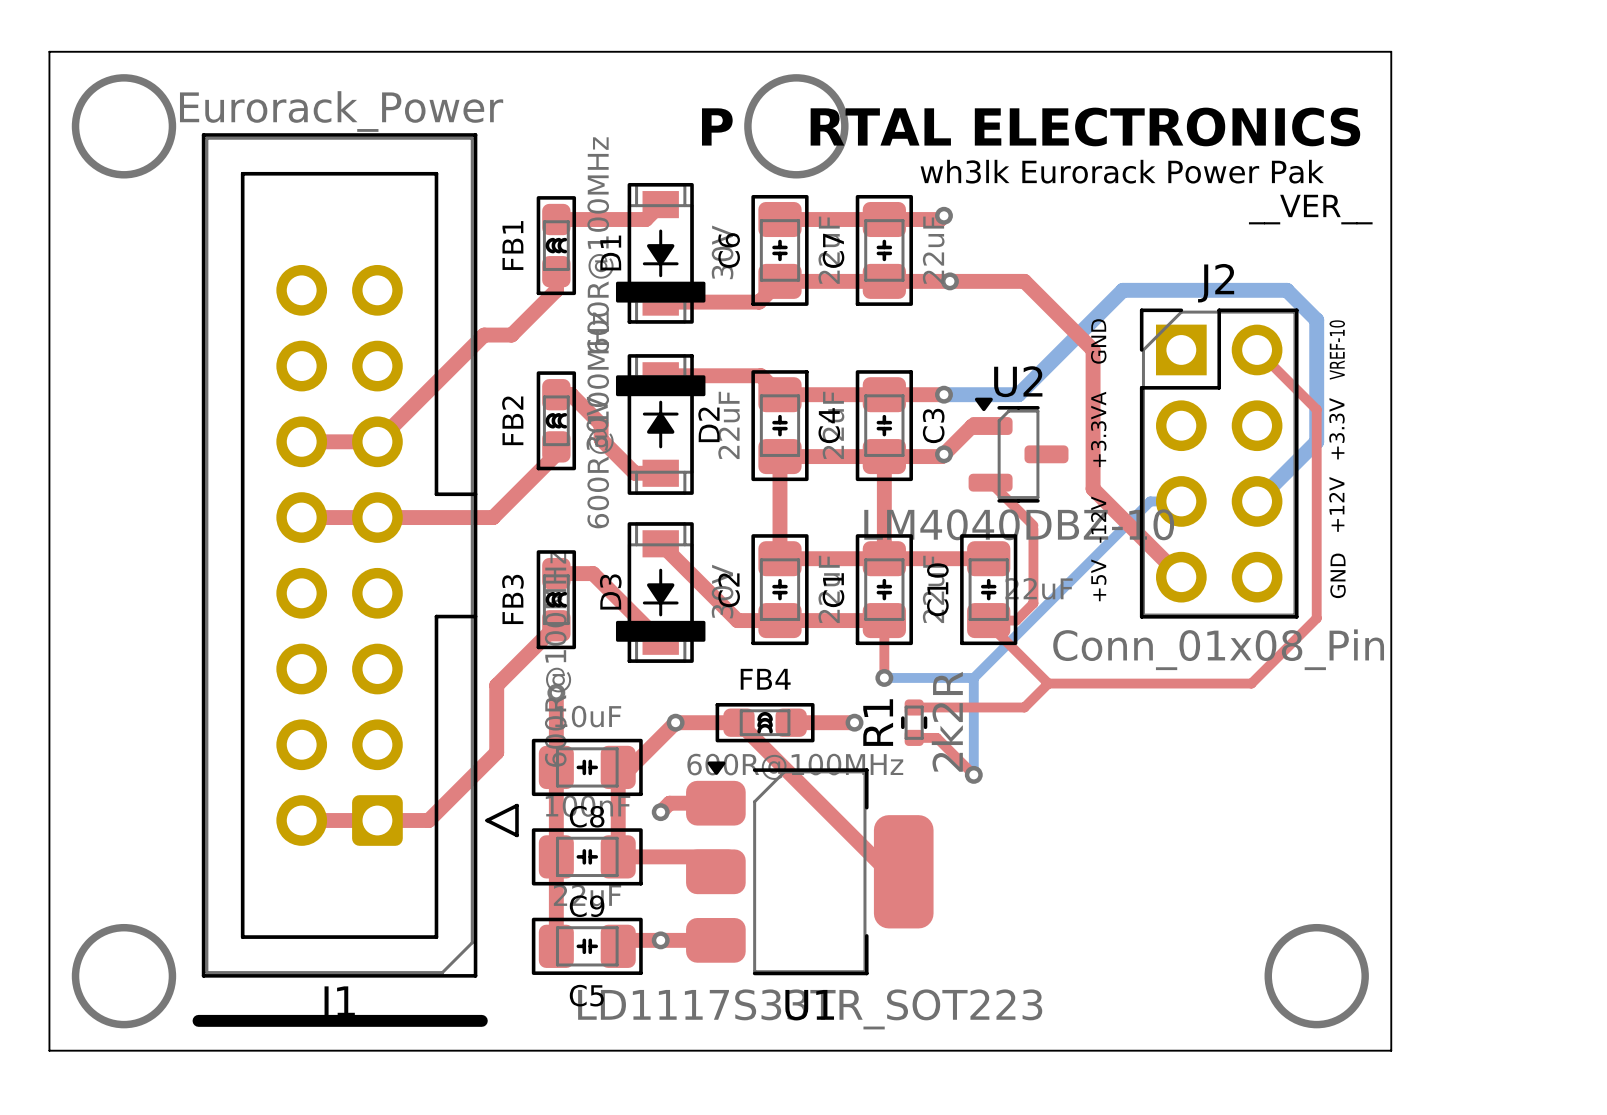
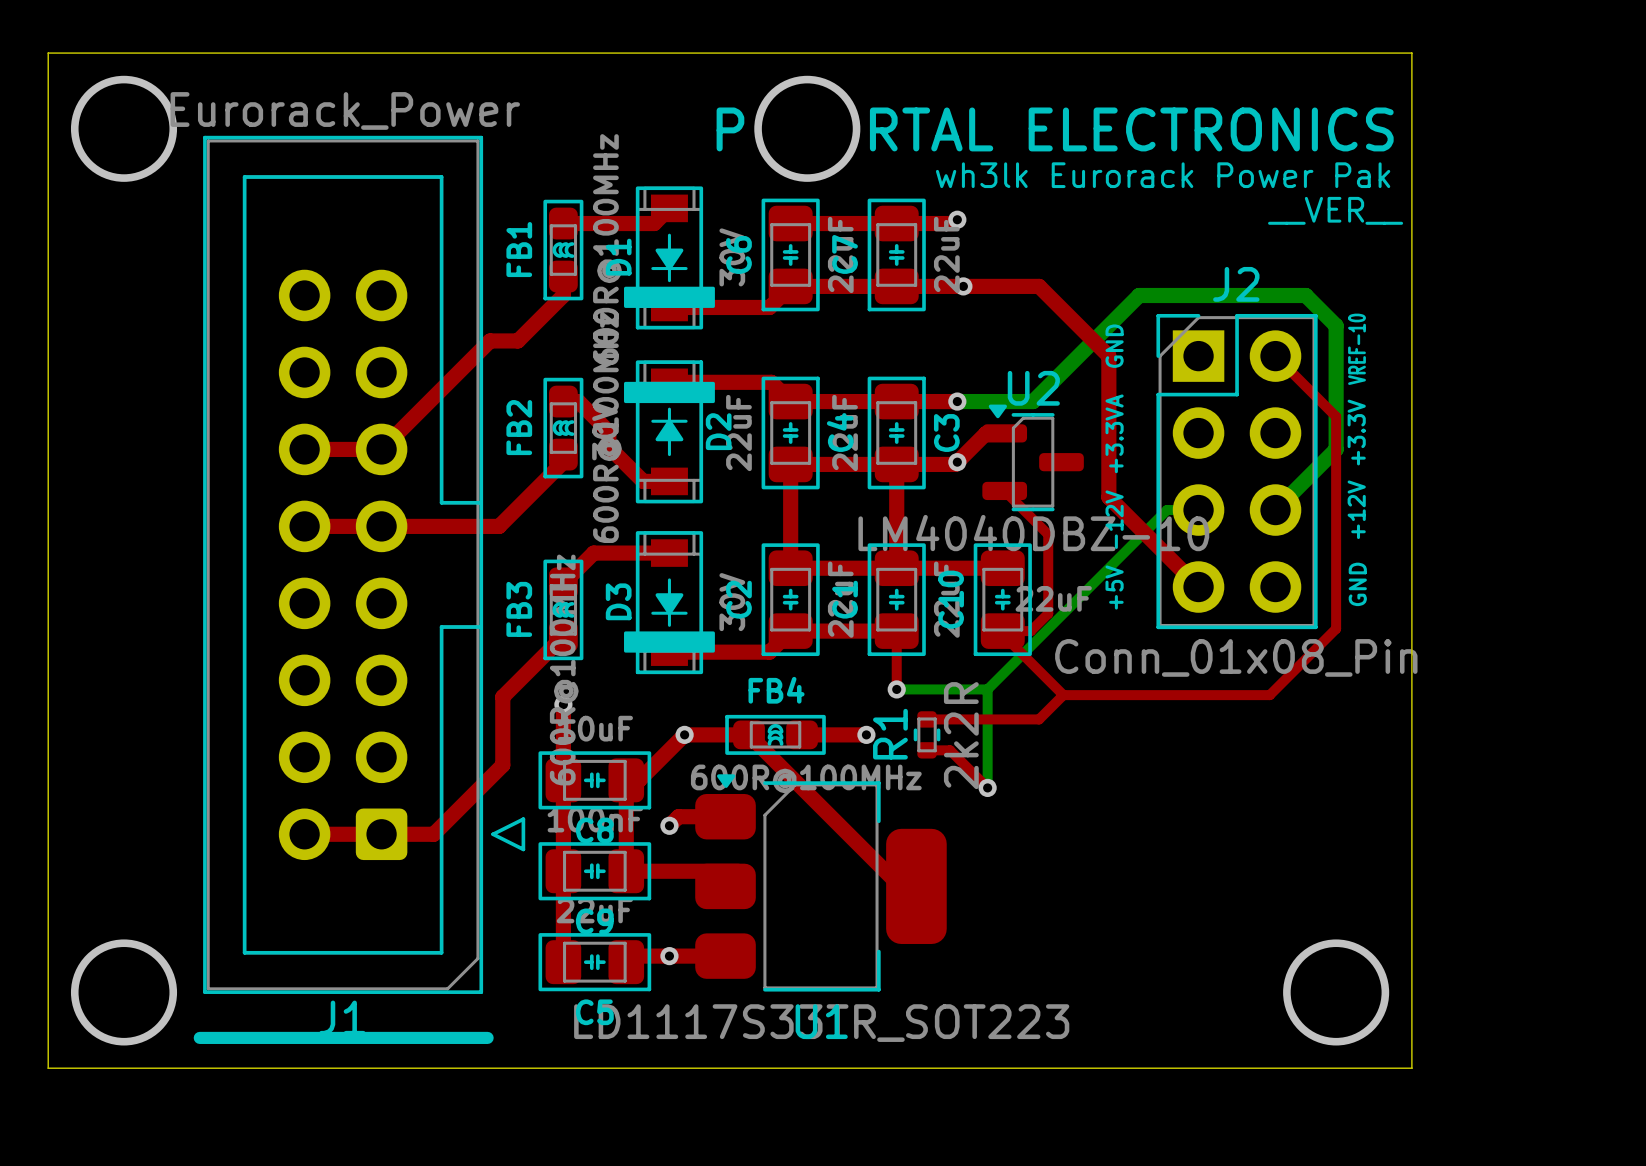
top track: (660, 543) (737, 620) (779, 620) -> (669, 652) (769, 652) (790, 631)
top track: (556, 573) (593, 573) (660, 641) -> (563, 583) (593, 553) (669, 553)

